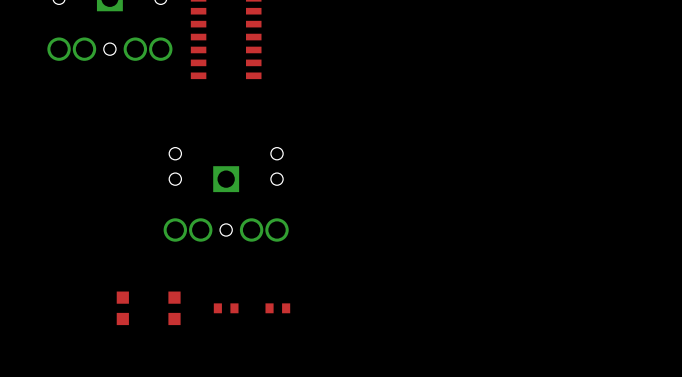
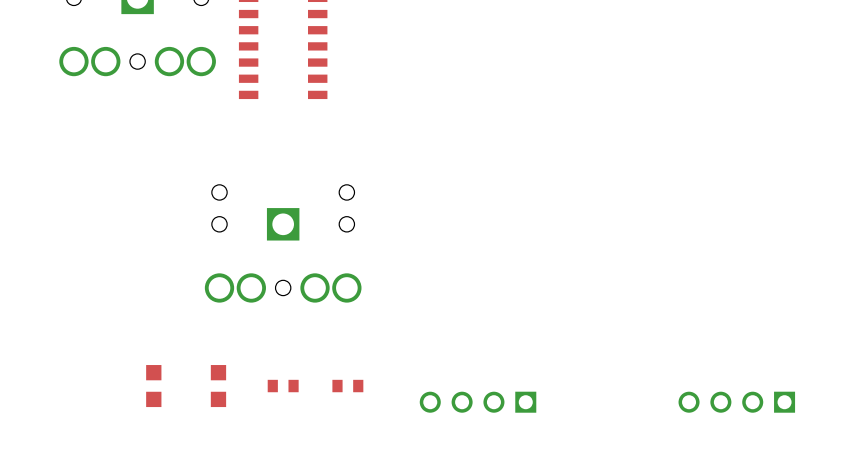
part: none -> (478, 402)
part: none -> (736, 402)

